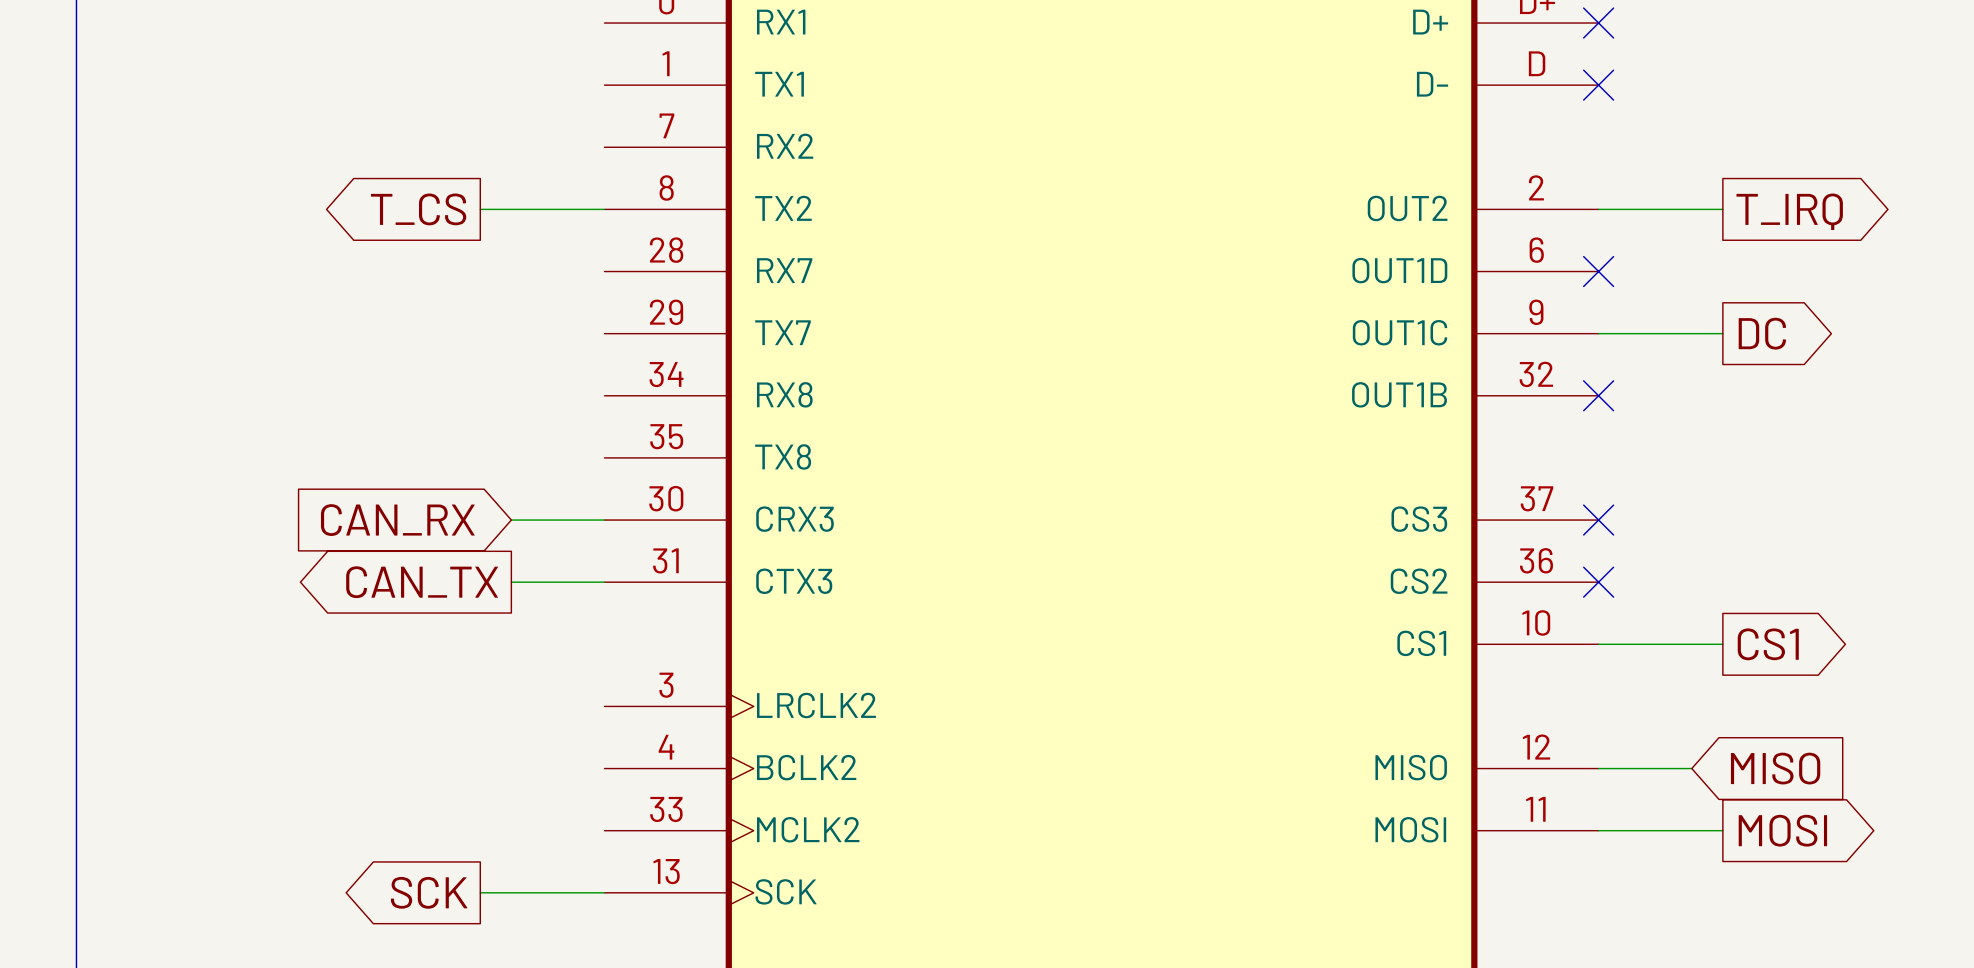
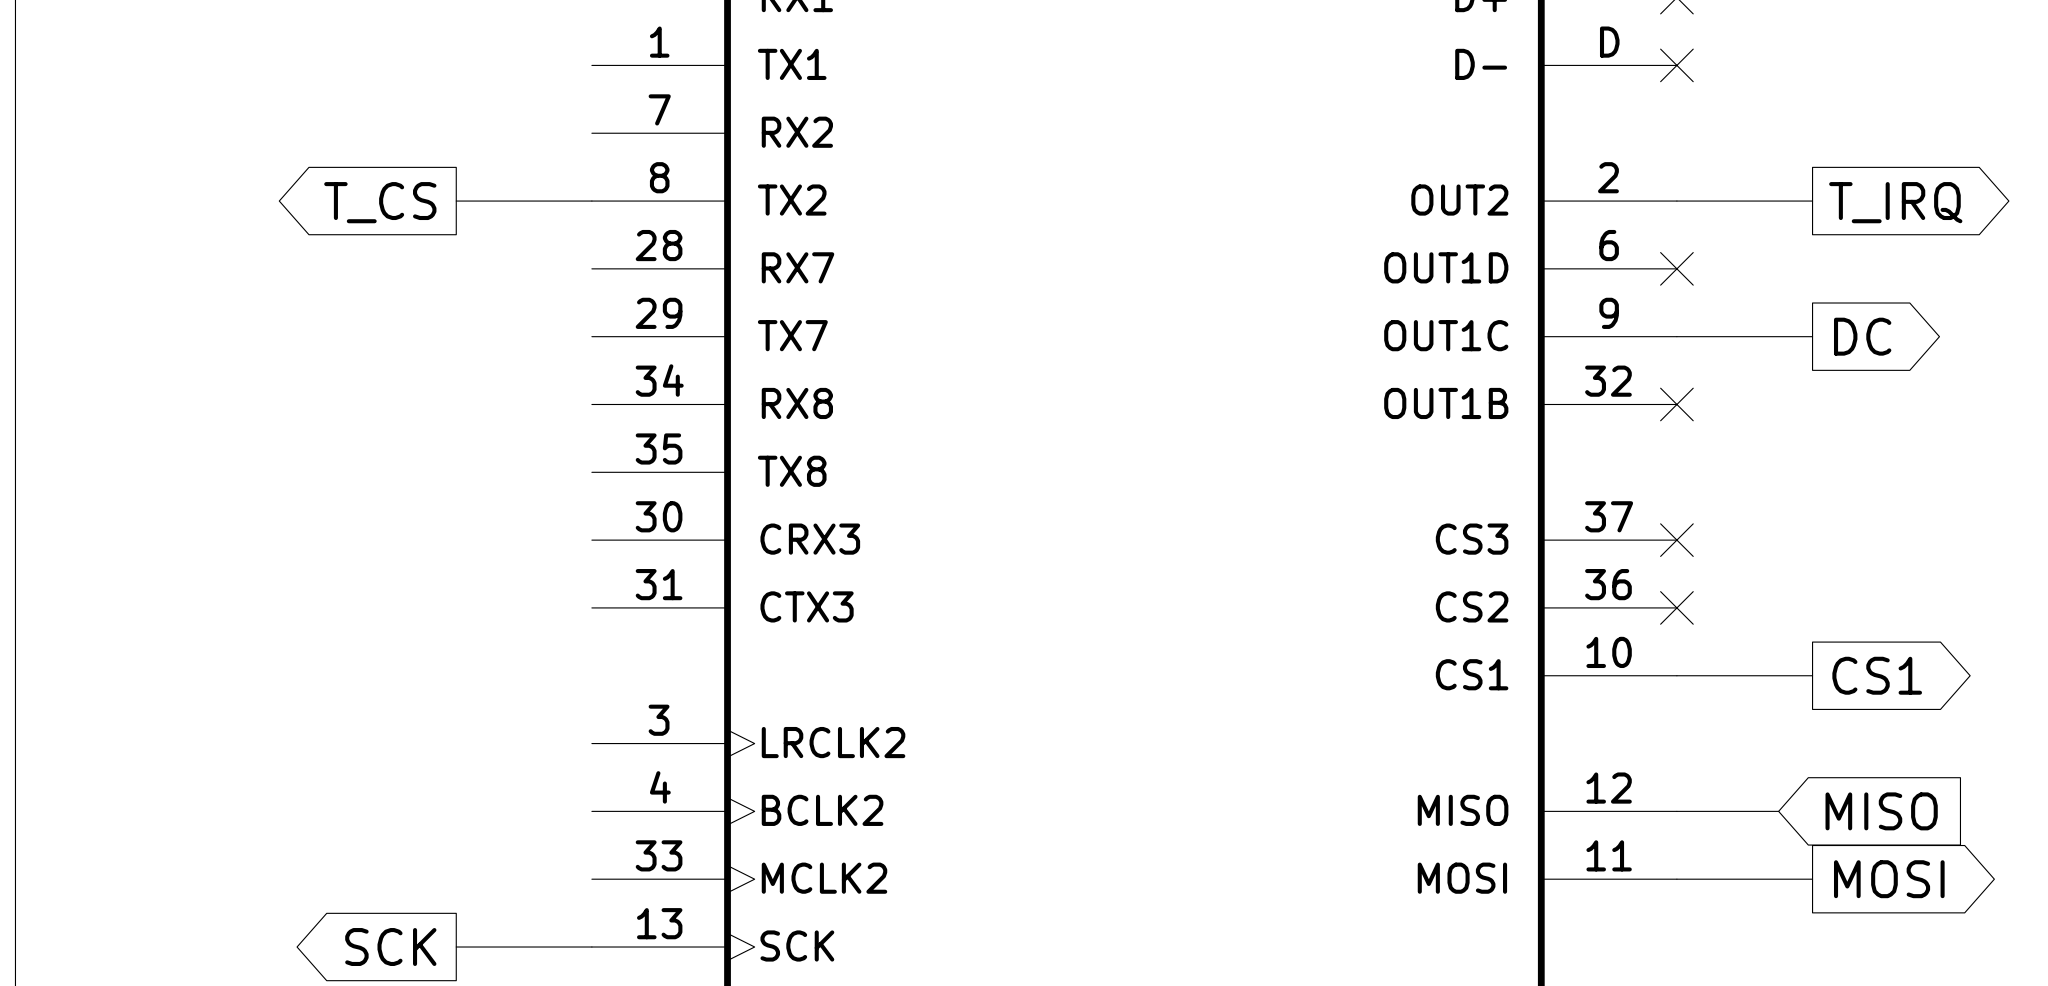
global label: CAN_RX (397, 520) -> none
wire: (511, 520) (604, 520) -> none
global label: CAN_TX (422, 582) -> none
wire: (511, 582) (604, 582) -> none

